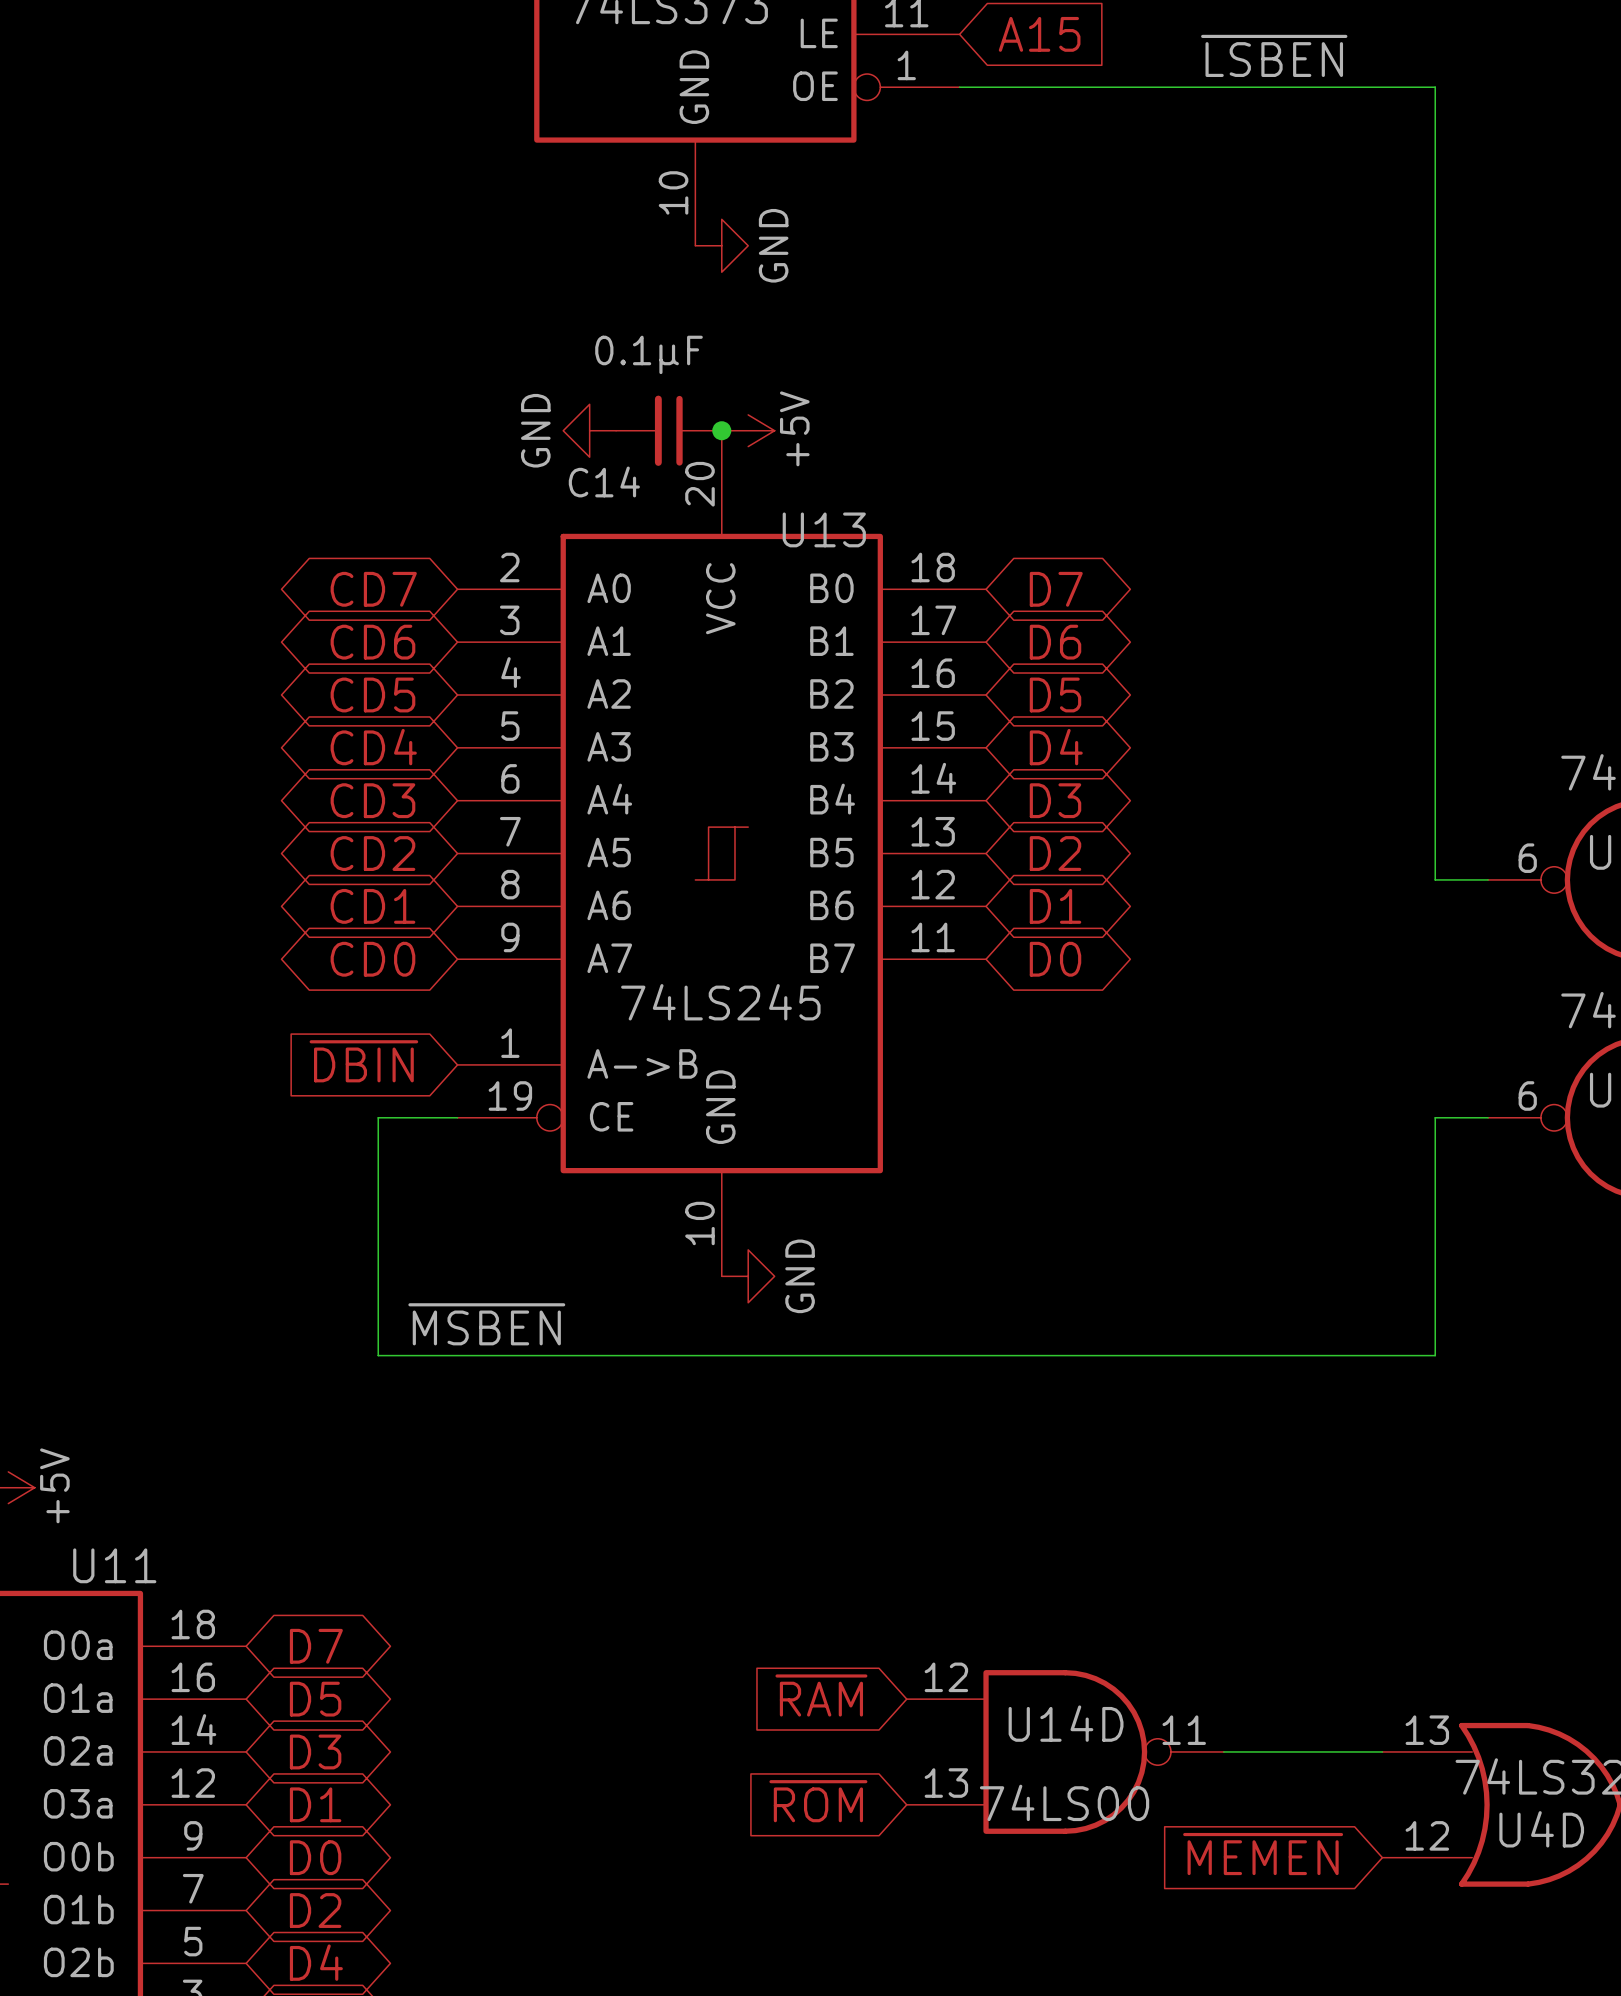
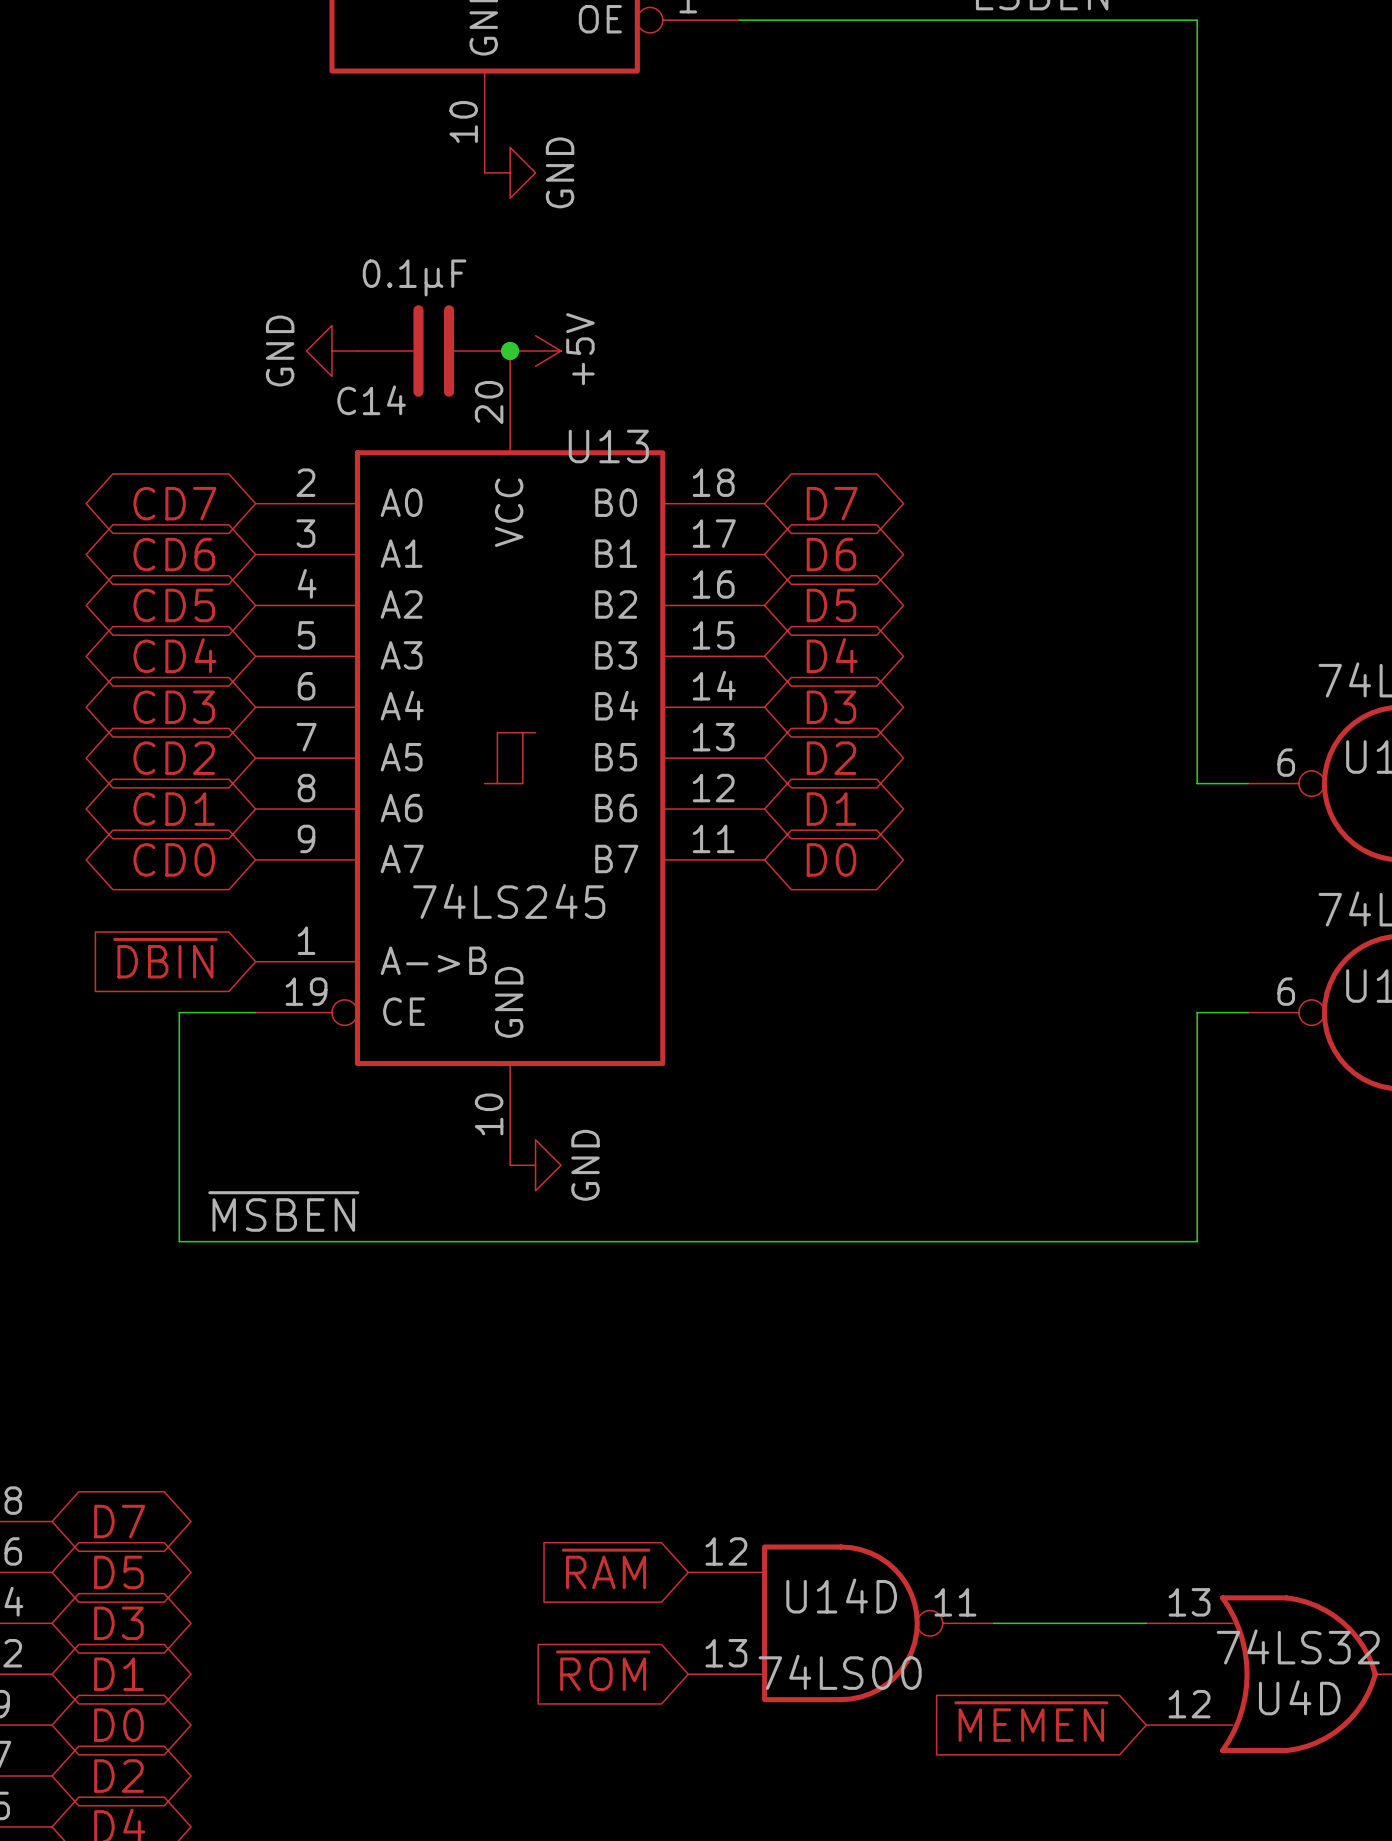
C14 symbol: [616, 395, 722, 466] -> [357, 305, 511, 397]
power symbol position: GND (589, 430) -> GND (331, 350)

